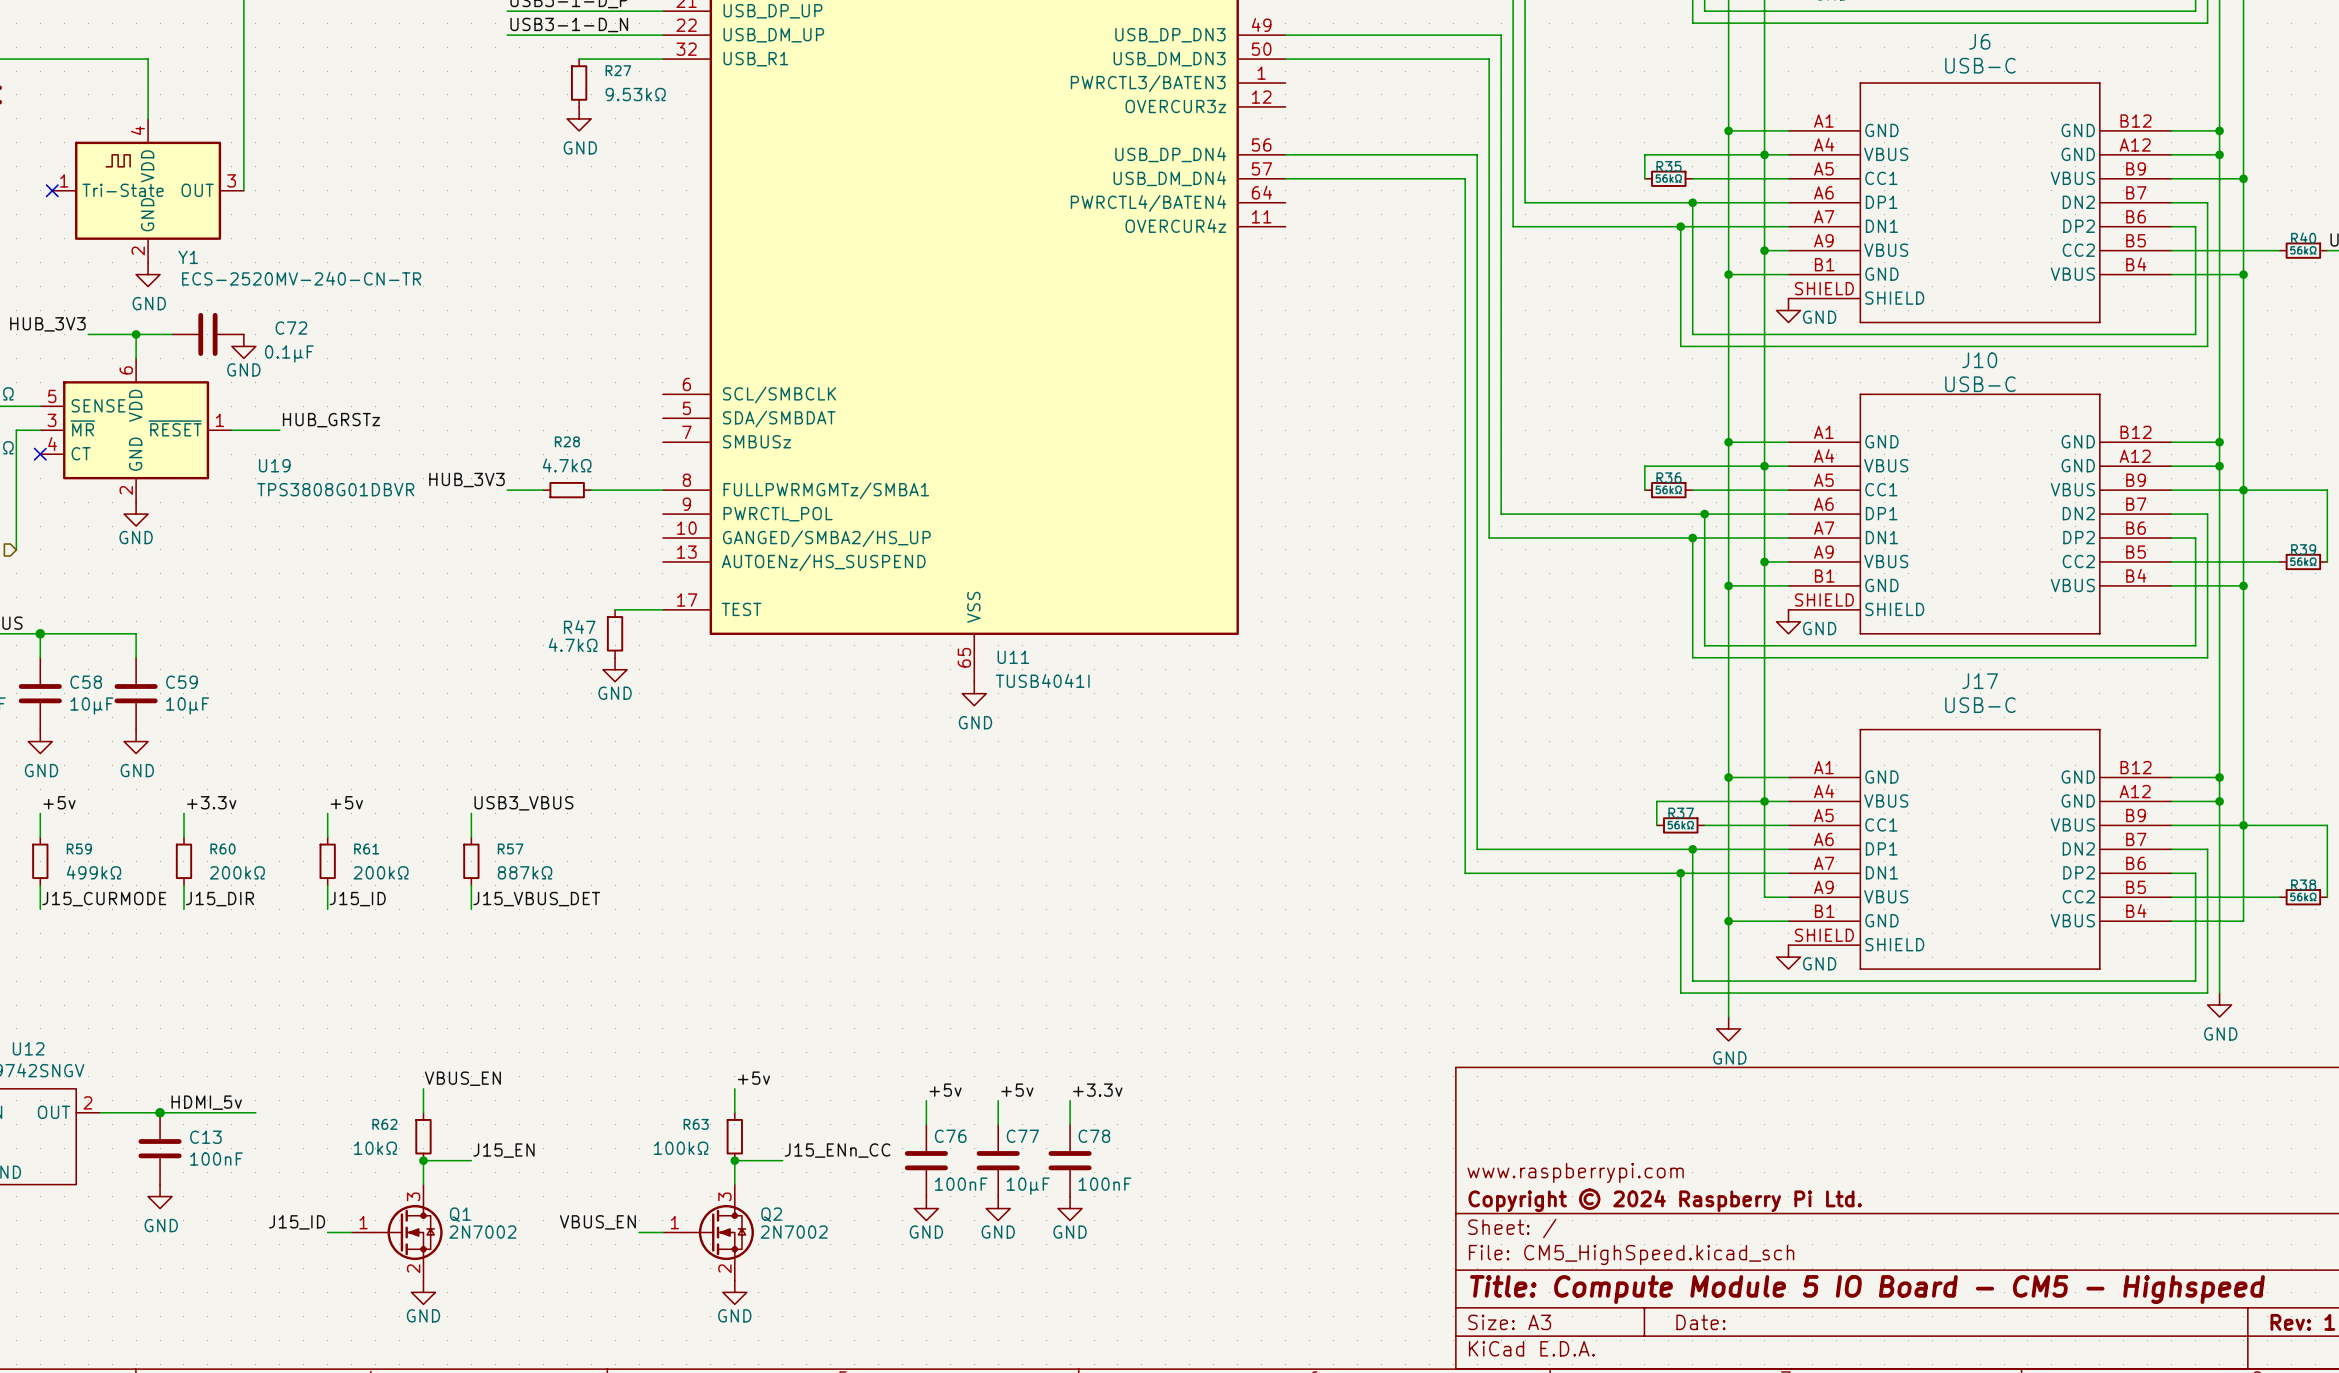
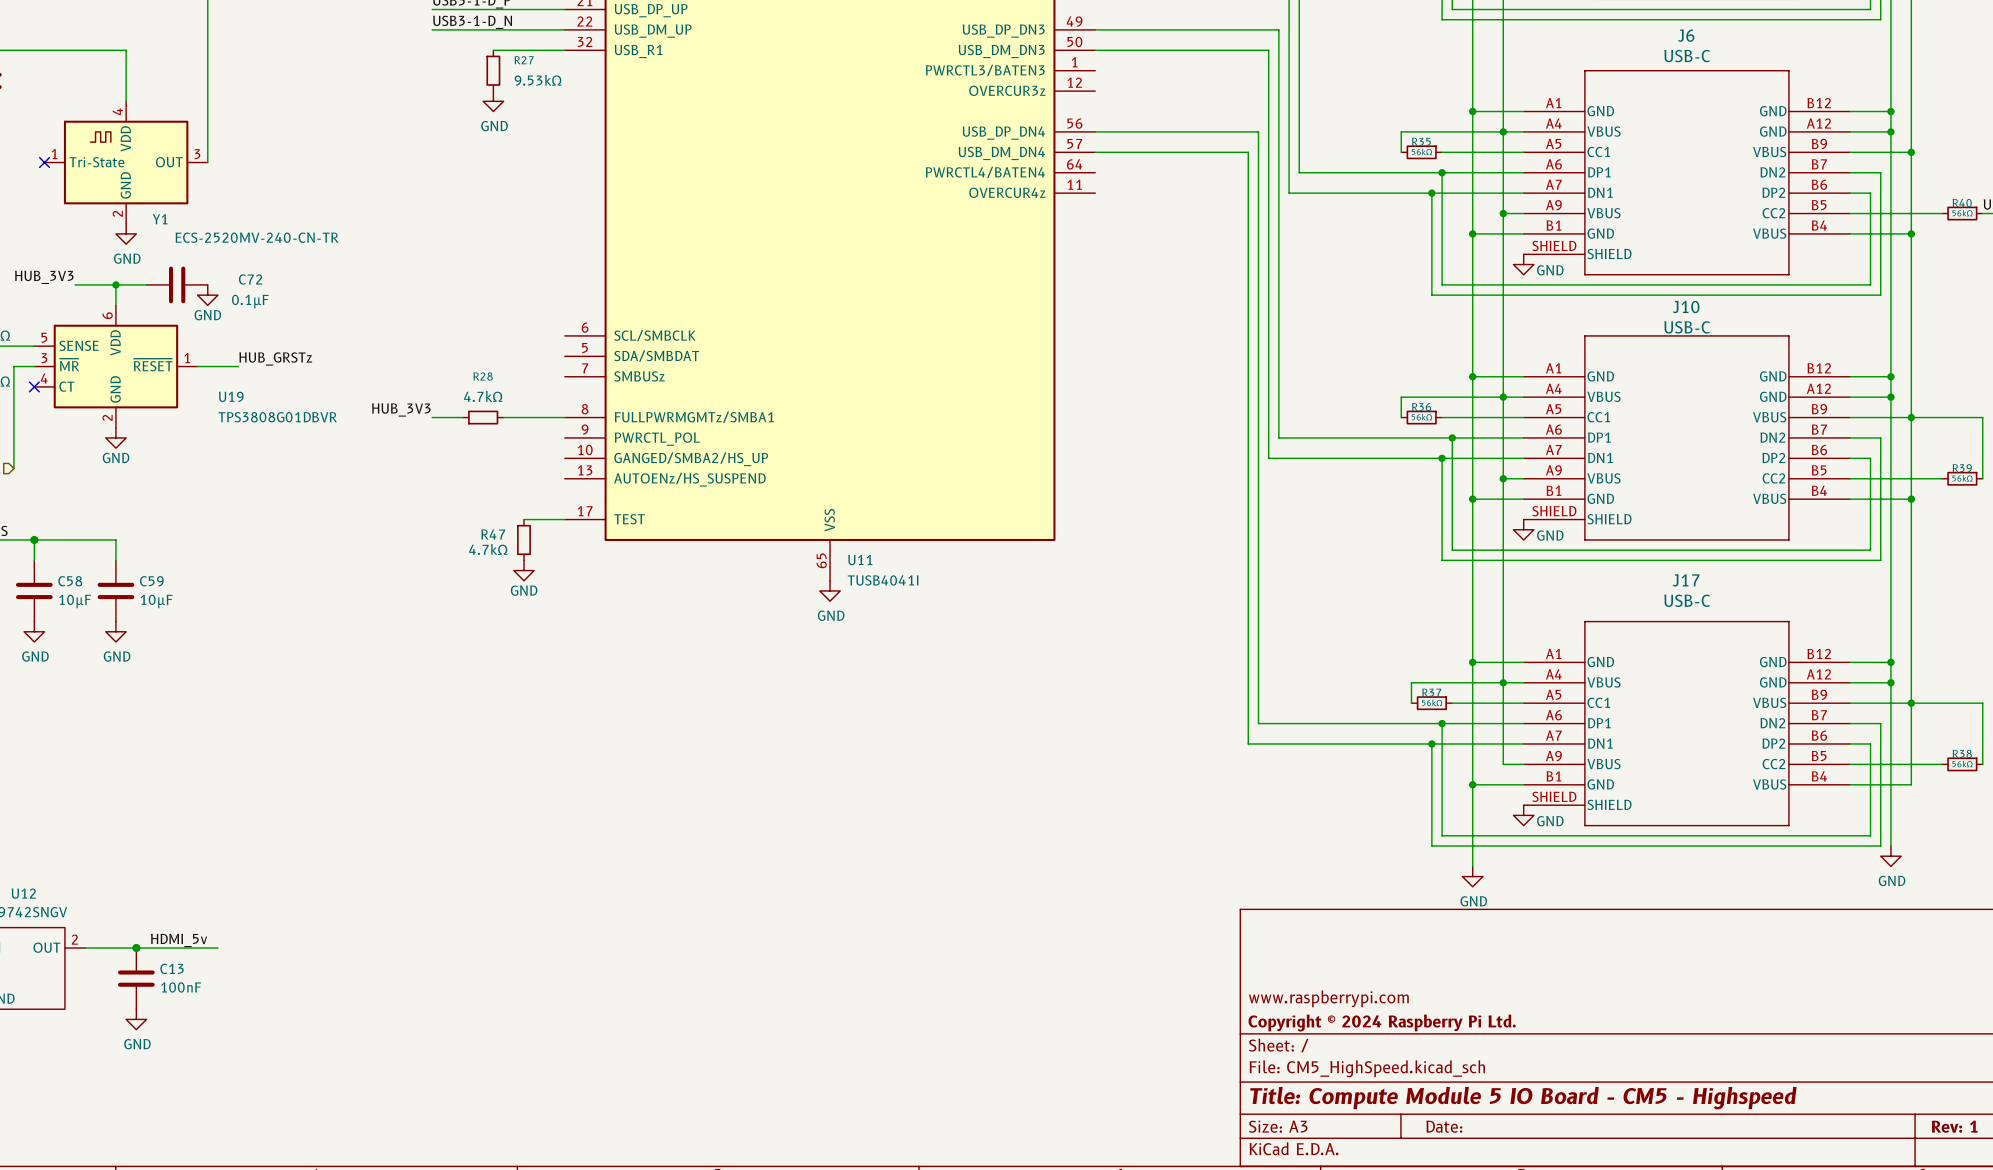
label: +5v (59, 802) -> none
label: +3.3v (211, 802) -> none
label: +5v (346, 802) -> none
label: USB3_VBUS (523, 803) -> none
wire: (40, 813) (40, 837) -> none
wire: (183, 813) (183, 837) -> none
wire: (327, 813) (327, 837) -> none
wire: (471, 813) (471, 837) -> none
R59: 499kΩ (40, 861) -> none
R60: 200kΩ (183, 861) -> none
R61: 200kΩ (327, 861) -> none
R57: 887kΩ (471, 861) -> none
wire: (40, 885) (40, 909) -> none
wire: (183, 885) (183, 909) -> none
wire: (327, 885) (327, 909) -> none
wire: (471, 885) (471, 909) -> none
label: J15_CURMODE (104, 899) -> none
label: J15_DIR (220, 899) -> none
label: J15_ID (357, 899) -> none
label: J15_VBUS_DET (536, 899) -> none
label: VBUS_EN (462, 1078) -> none
label: +5v (753, 1078) -> none
wire: (423, 1088) (423, 1112) -> none
wire: (734, 1088) (734, 1112) -> none
label: +5v (945, 1090) -> none
label: +5v (1017, 1090) -> none
label: +3.3v (1097, 1090) -> none
wire: (926, 1100) (926, 1124) -> none
wire: (998, 1100) (998, 1124) -> none
wire: (1070, 1100) (1070, 1124) -> none
R62: 10kΩ (423, 1136) -> none
R63: 100kΩ (734, 1136) -> none
label: J15_EN (503, 1150) -> none
label: J15_ENn_CC (837, 1150) -> none
junction: (423, 1160) -> none
wire: (471, 1160) (423, 1160) (423, 1184) -> none
junction: (734, 1160) -> none
wire: (782, 1160) (734, 1160) (734, 1184) -> none
C76: 100nF (926, 1160) -> none
C77: 10µF (998, 1160) -> none
C78: 100nF (1070, 1160) -> none
power symbol: GND (926, 1208) -> none
power symbol: GND (998, 1208) -> none
power symbol: GND (1070, 1208) -> none
label: J15_ID (297, 1222) -> none
label: VBUS_EN (597, 1222) -> none
wire: (327, 1232) (351, 1232) -> none
Q1: 2N7002 (397, 1232) -> none
wire: (639, 1232) (662, 1232) -> none
Q2: 2N7002 (708, 1232) -> none
power symbol: GND (423, 1292) -> none
power symbol: GND (734, 1292) -> none

